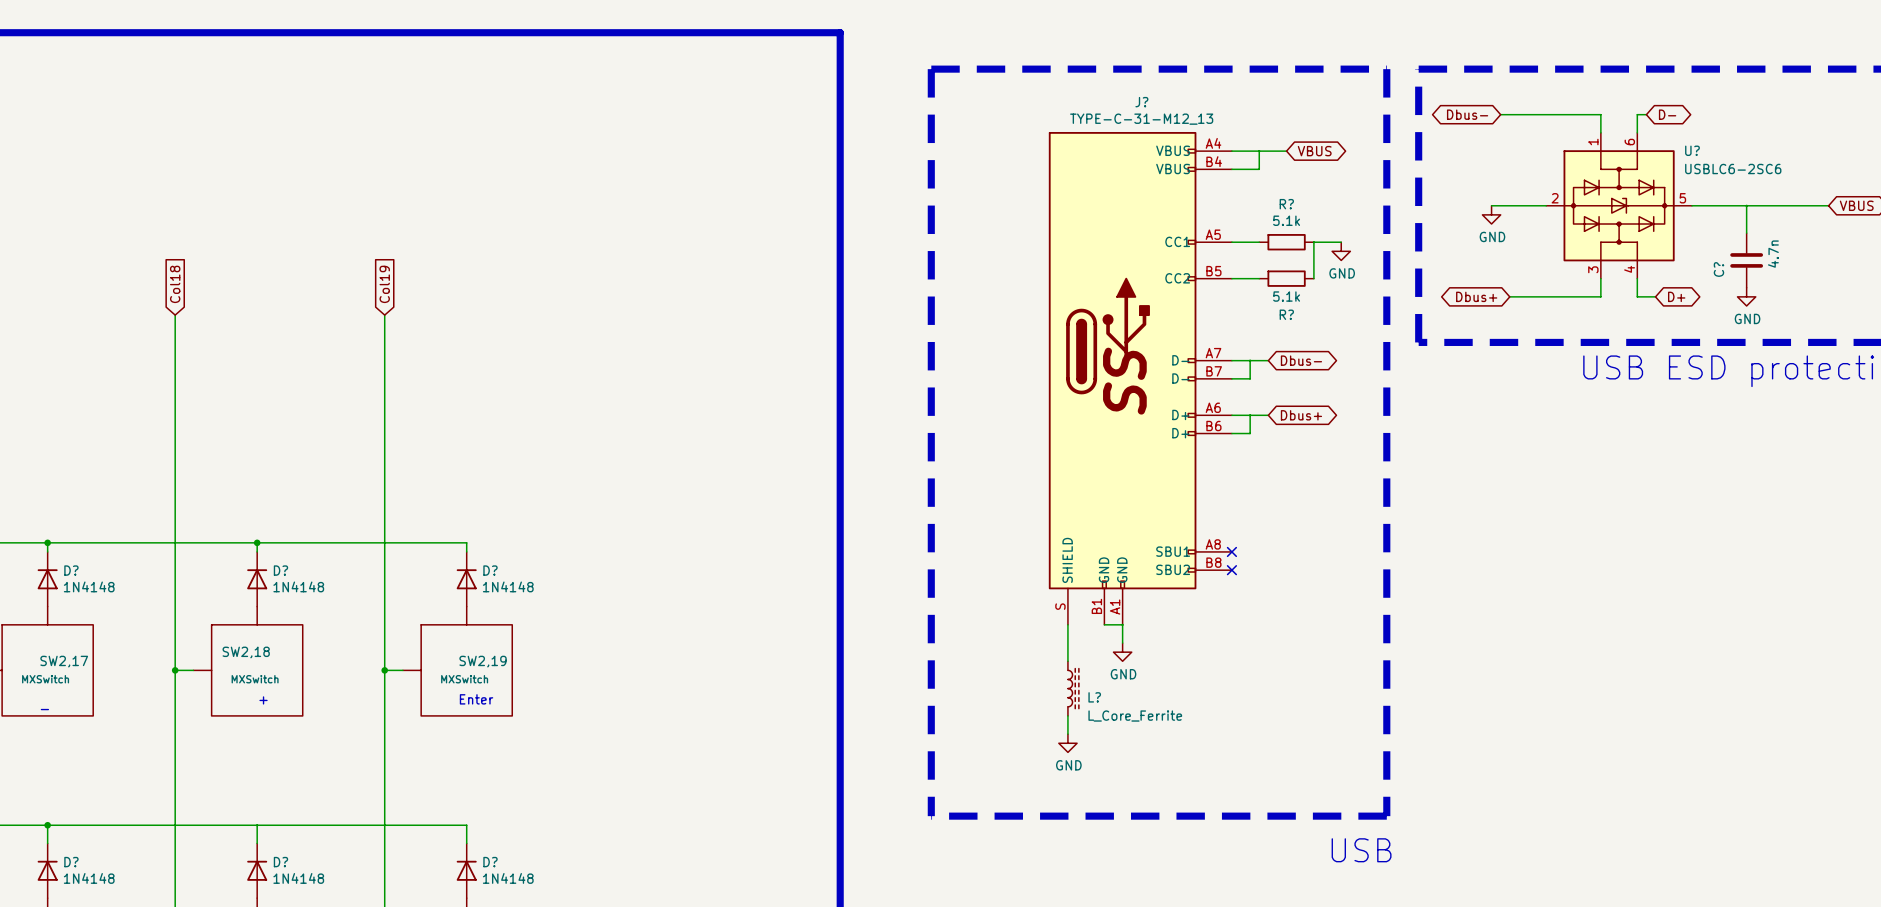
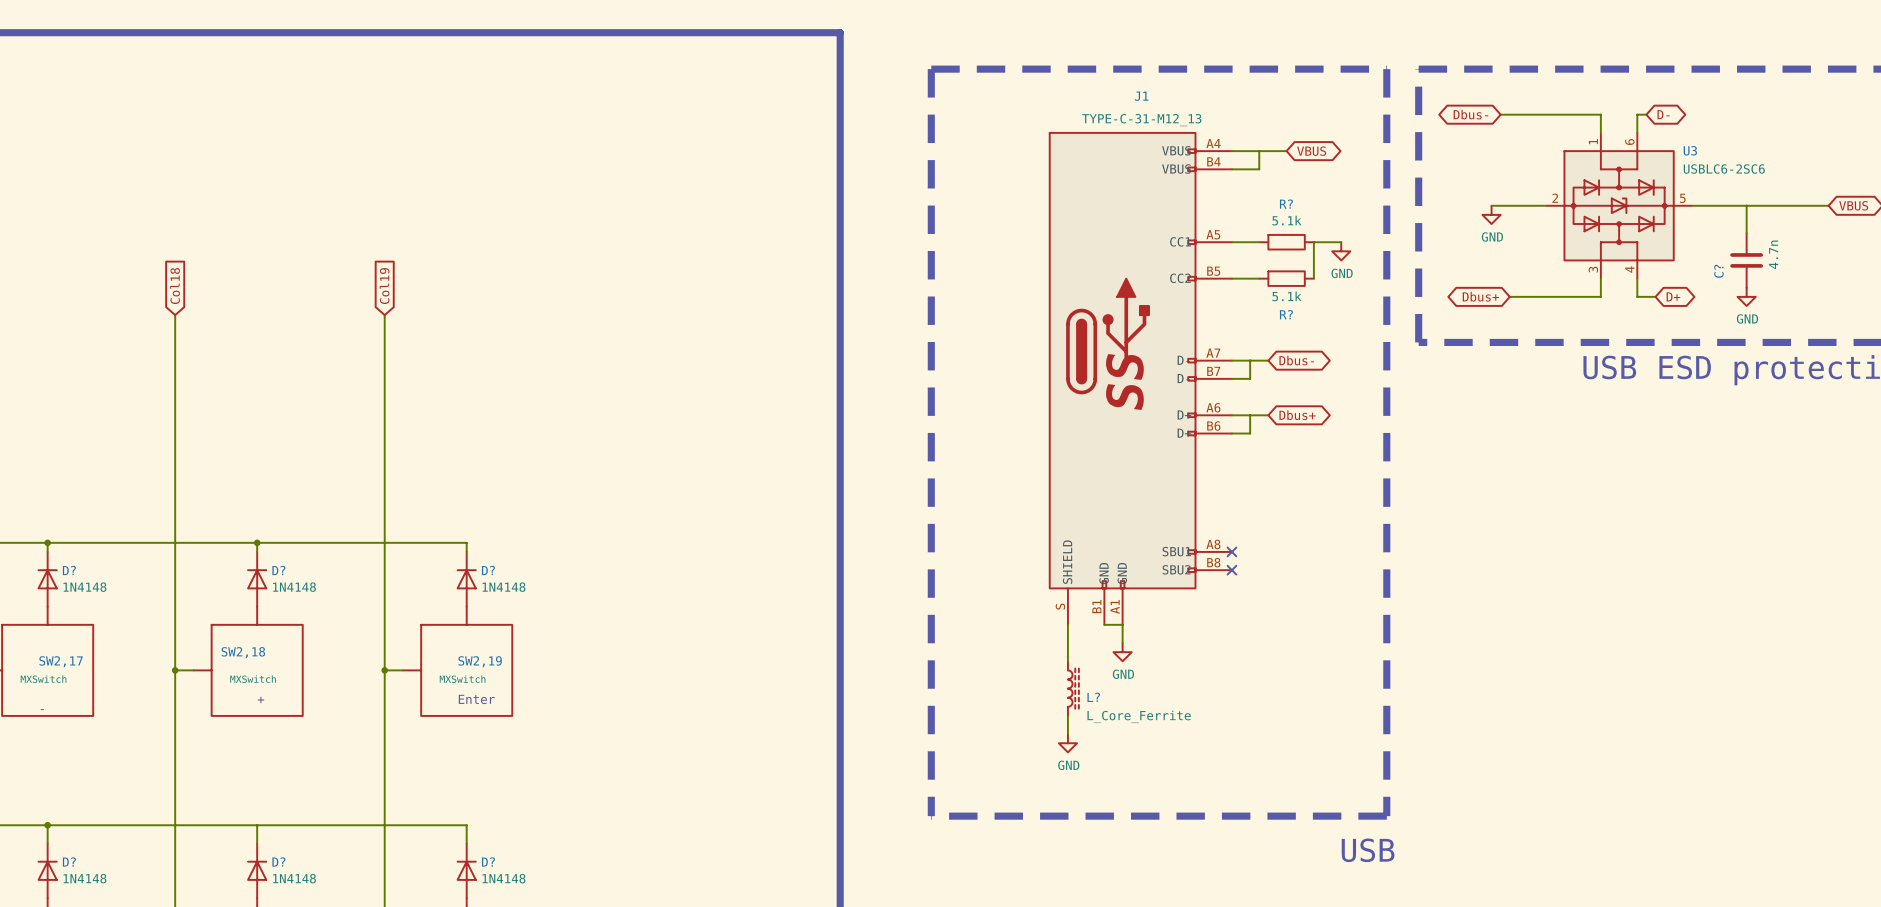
J? name: J? (1141, 102) -> J1 (1141, 96)
U? name: U? (1692, 150) -> U3 (1690, 150)

